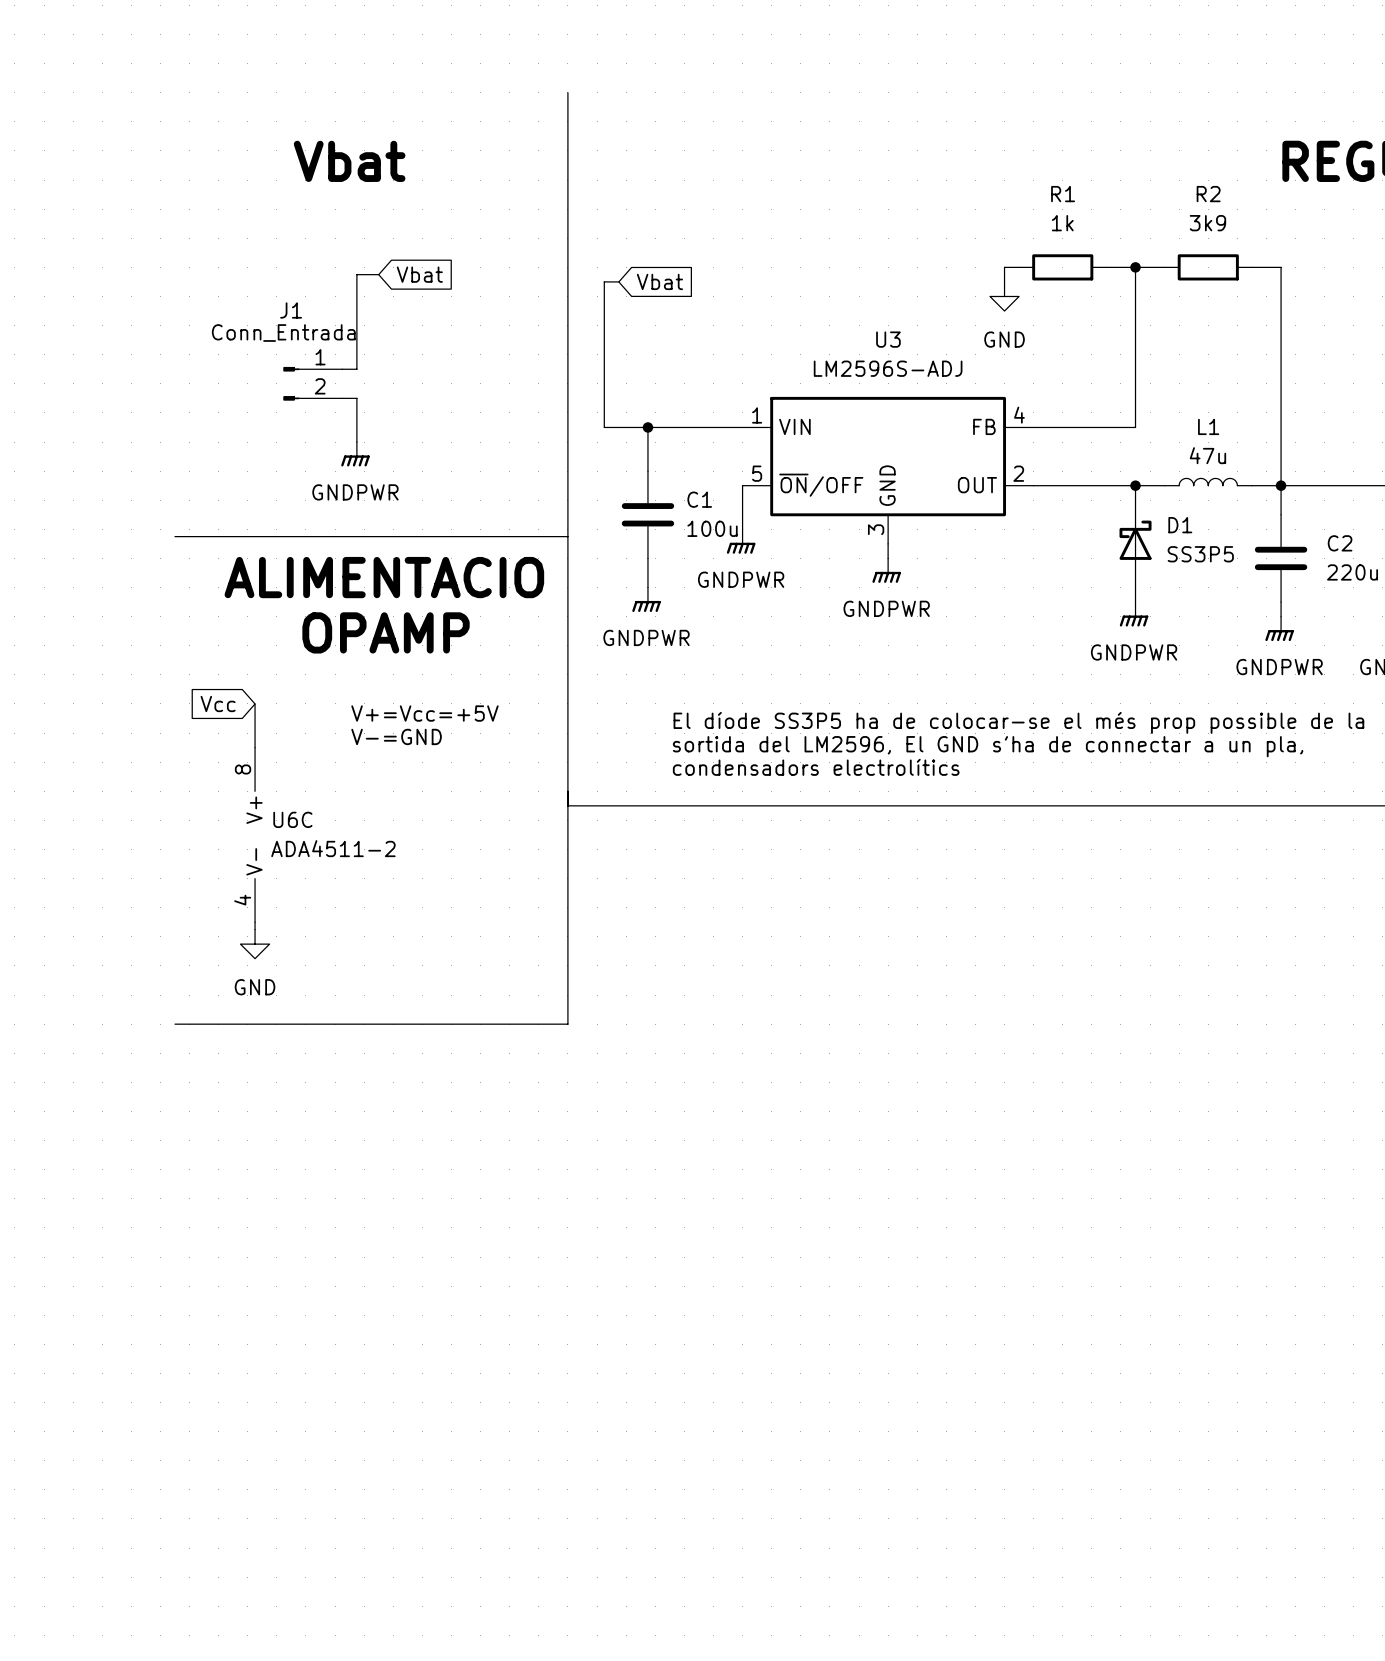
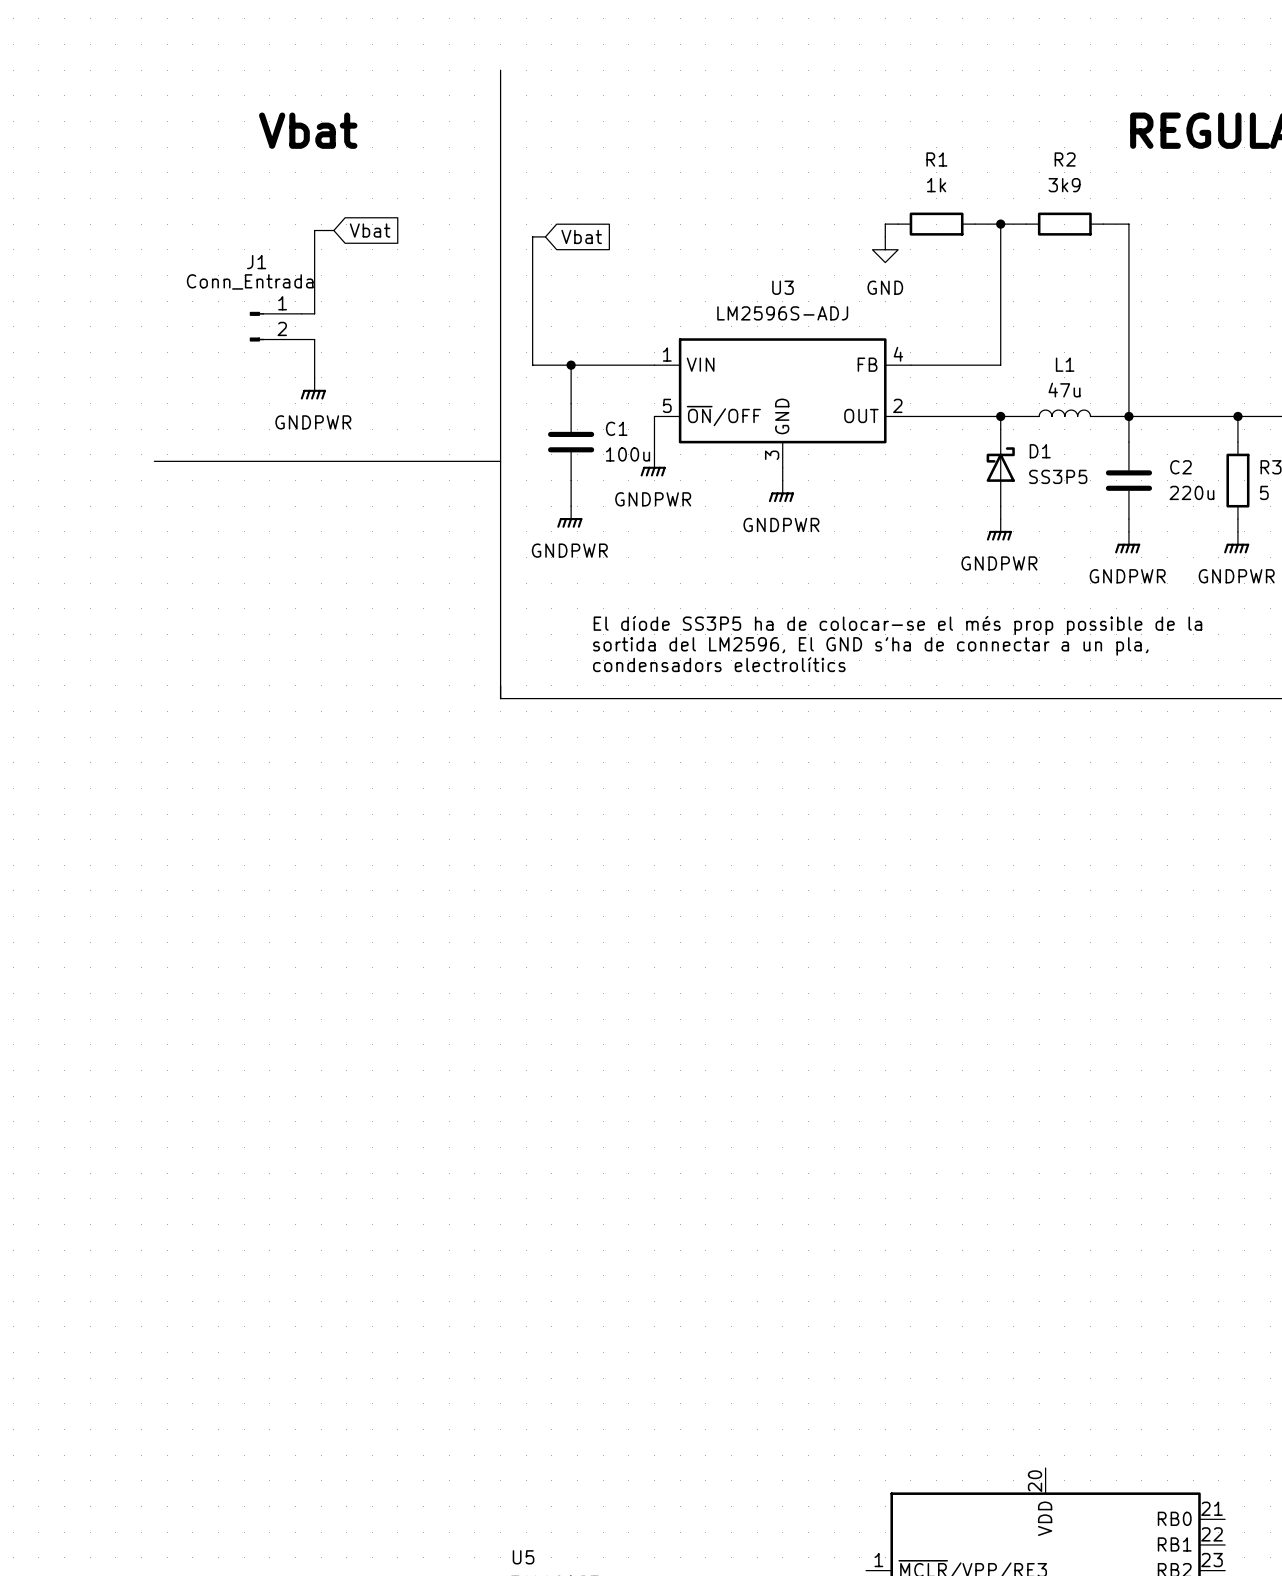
text: ALIMENTACIO (384, 577) -> none
text: OPAMP (386, 632) -> none
global label: Vcc (218, 703) -> none
wire: (255, 703) (255, 747) -> none
text: V+=Vcc=+5V (424, 713) -> none
text: V-=GND (396, 736) -> none
line: (567, 805) (567, 1024) (174, 1024) -> none
U6C: ADA4511-2 (255, 834) -> none
wire: (255, 922) (255, 929) -> none
power symbol: GND (255, 944) -> none

